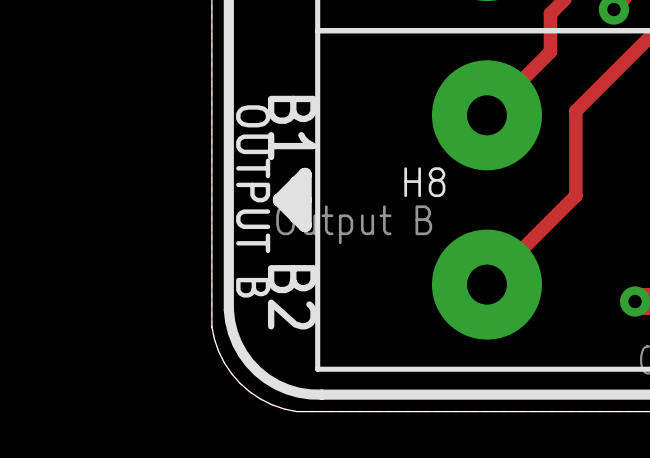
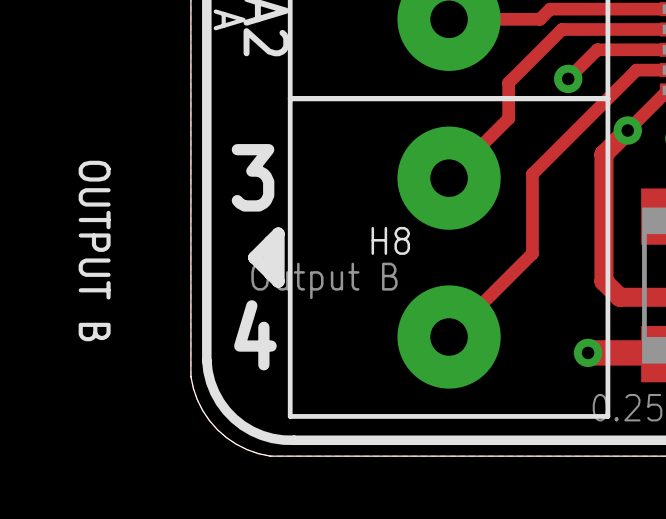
text: none -> 3 (253, 177)
text: B1 (292, 127) -> none
text position: OUTPUT B (253, 201) -> OUTPUT B (94, 250)
text: none -> 4 (255, 335)
text: B2 (292, 297) -> none

